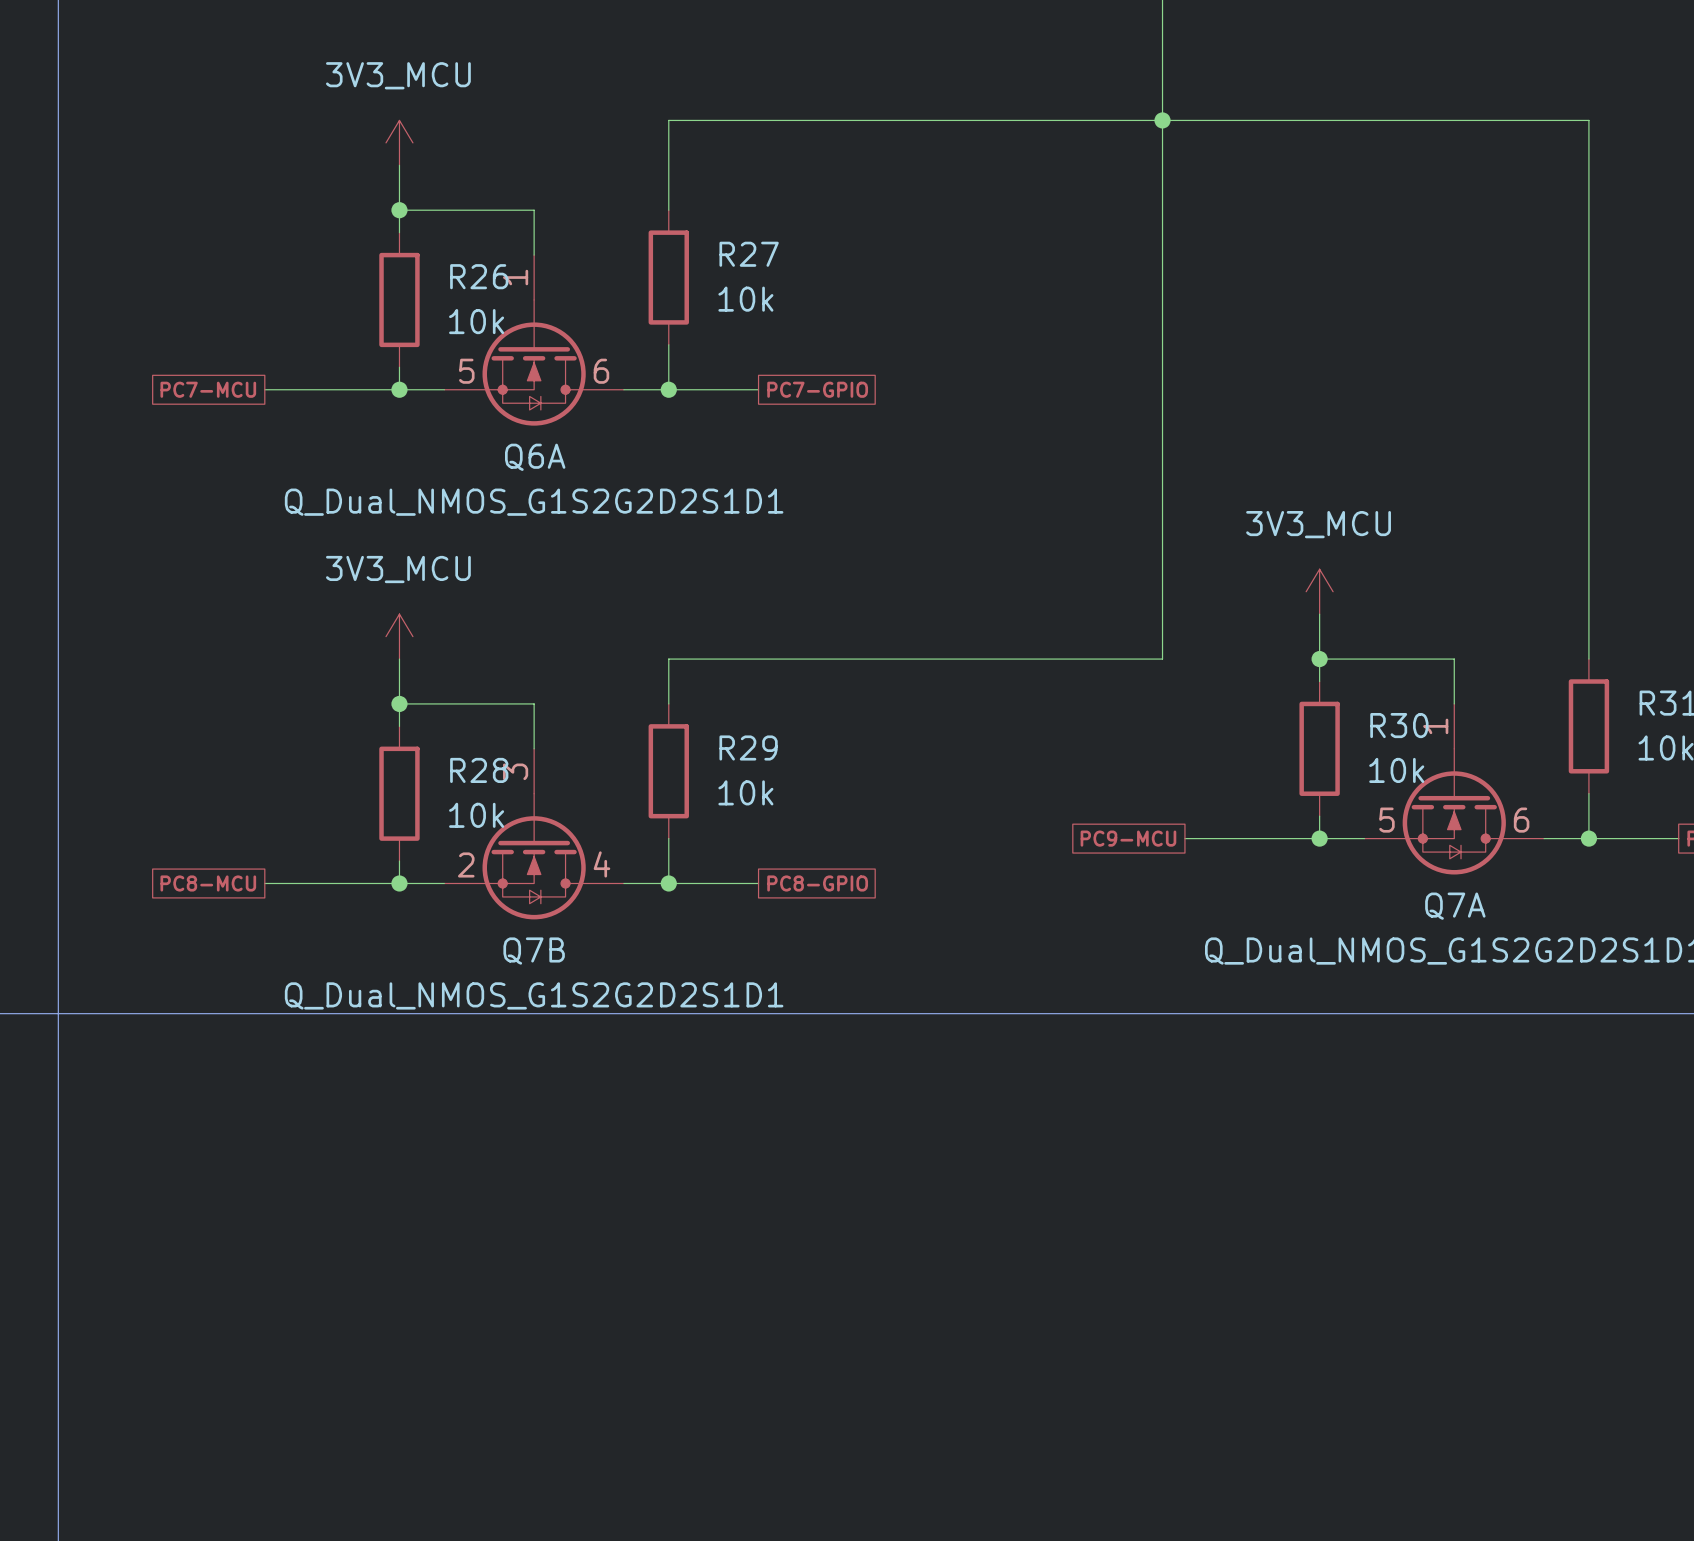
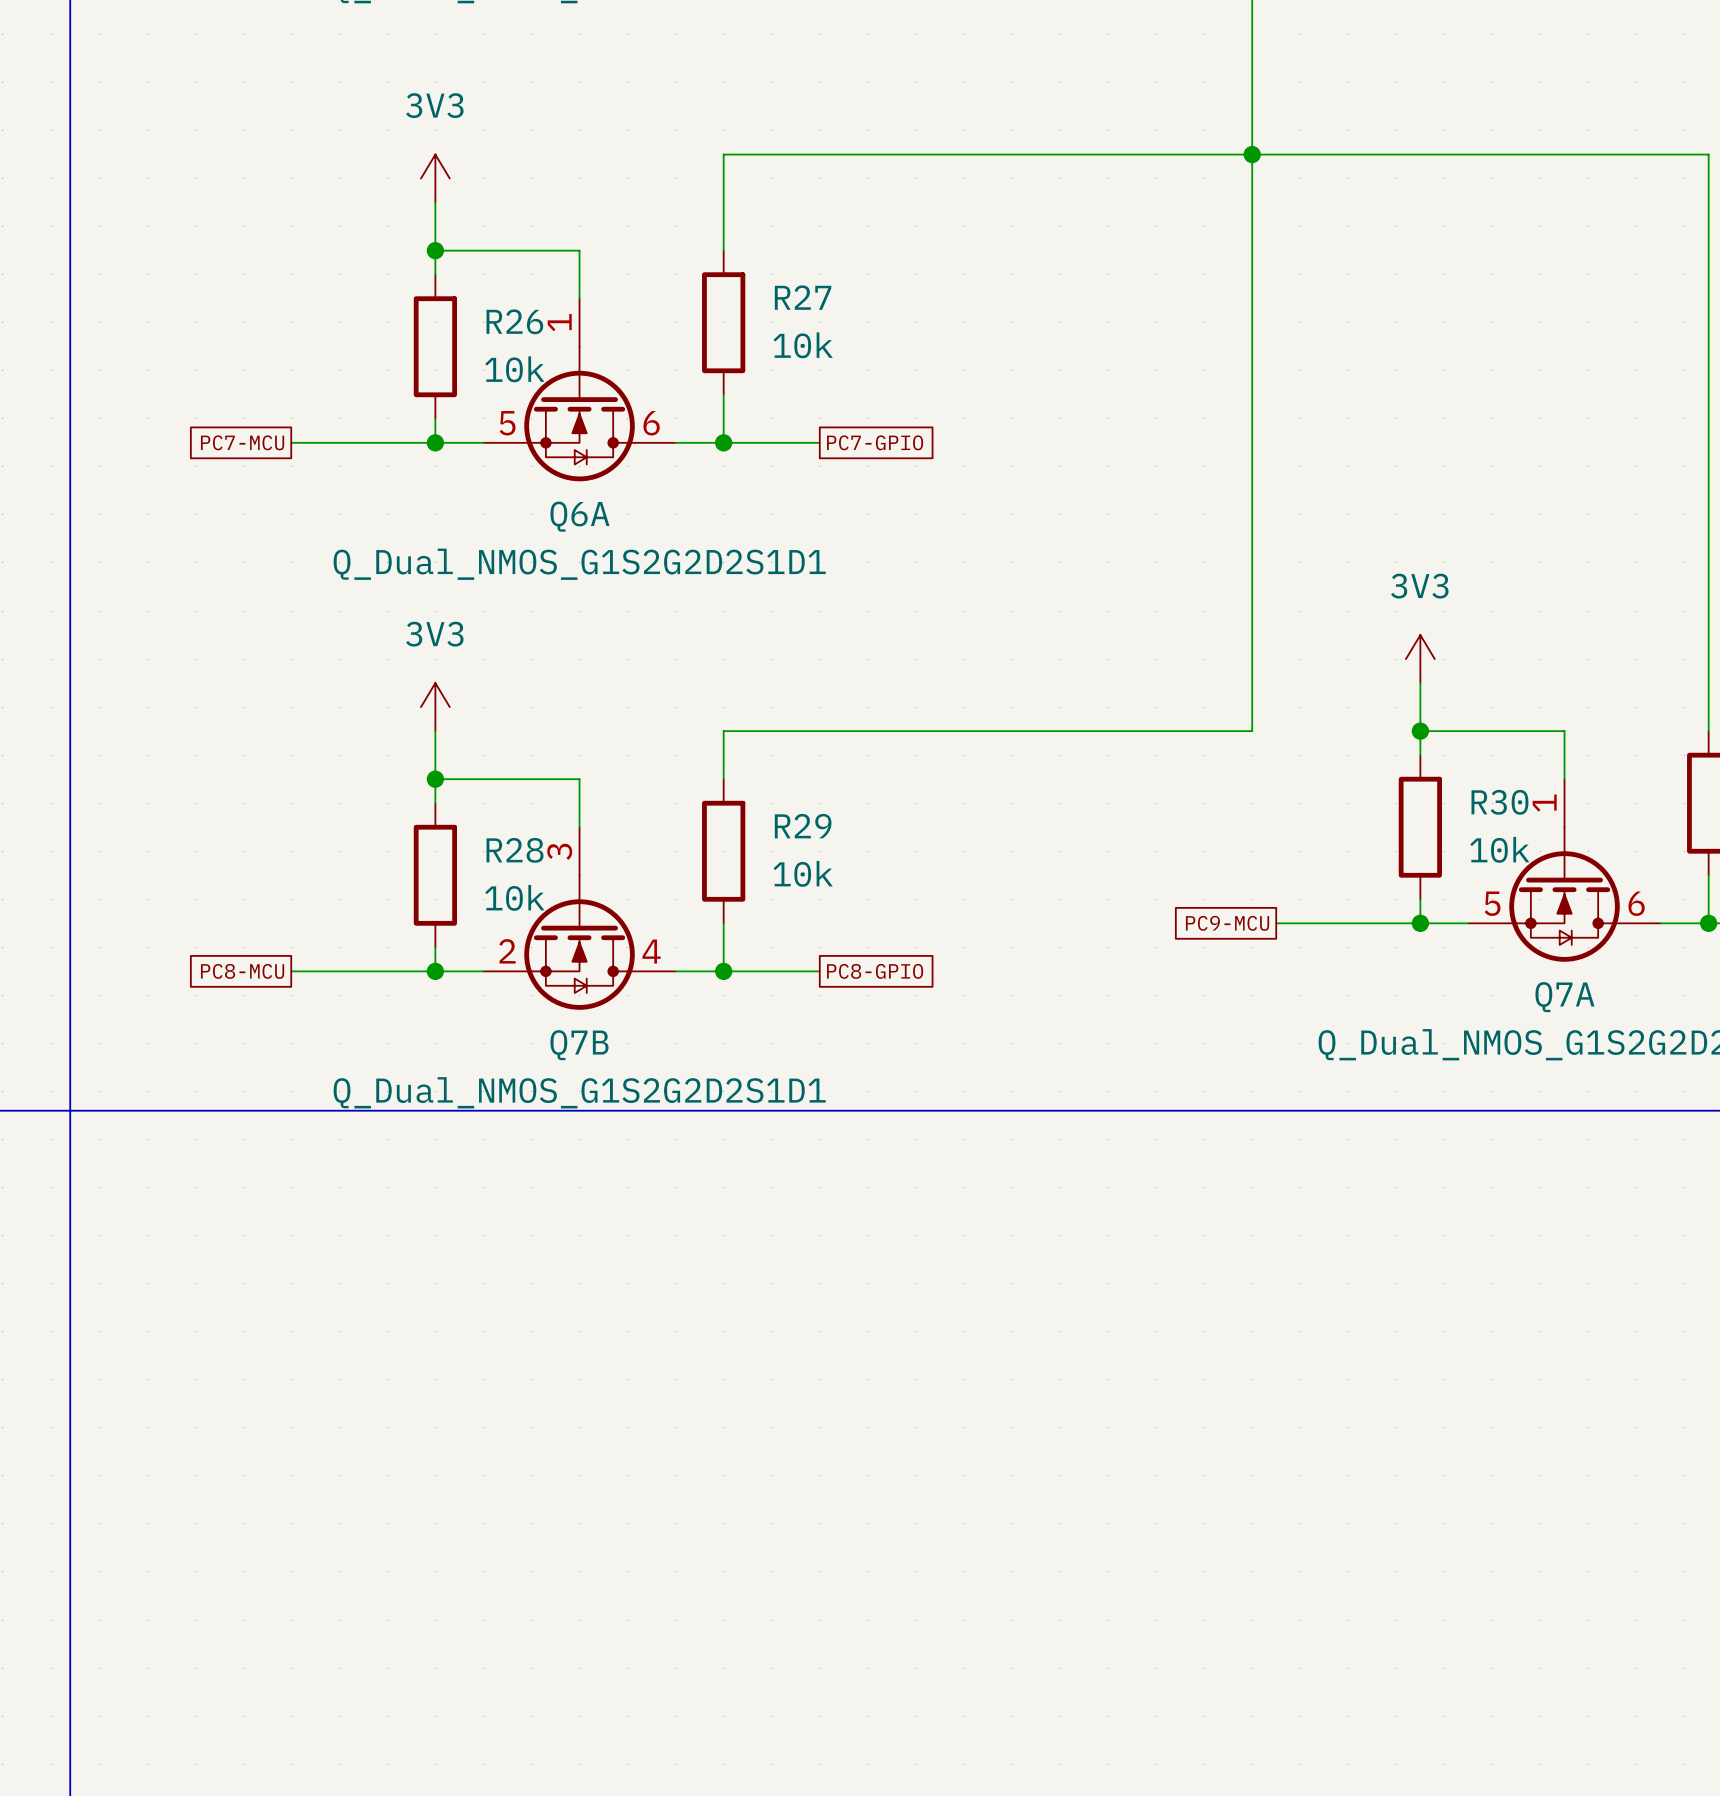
power symbol: 3V3_MCU (399, 142) -> 3V3 (435, 178)
power symbol: 3V3_MCU (1319, 591) -> 3V3 (1420, 659)
power symbol: 3V3_MCU (399, 636) -> 3V3 (435, 707)

